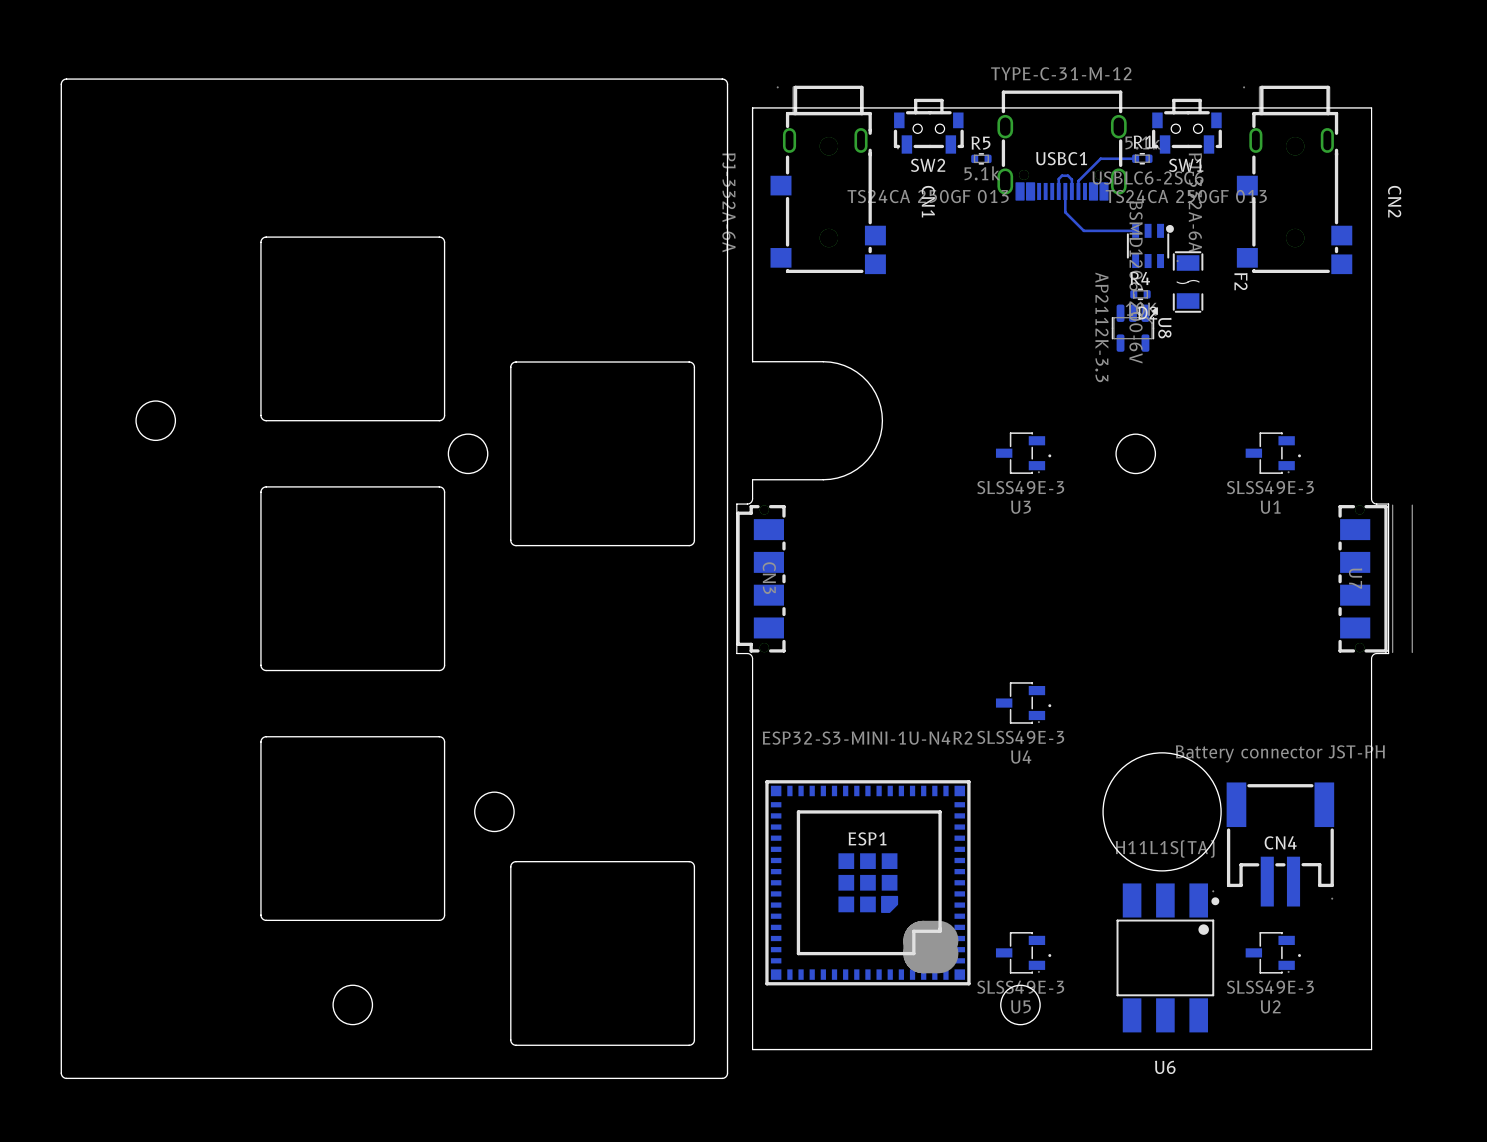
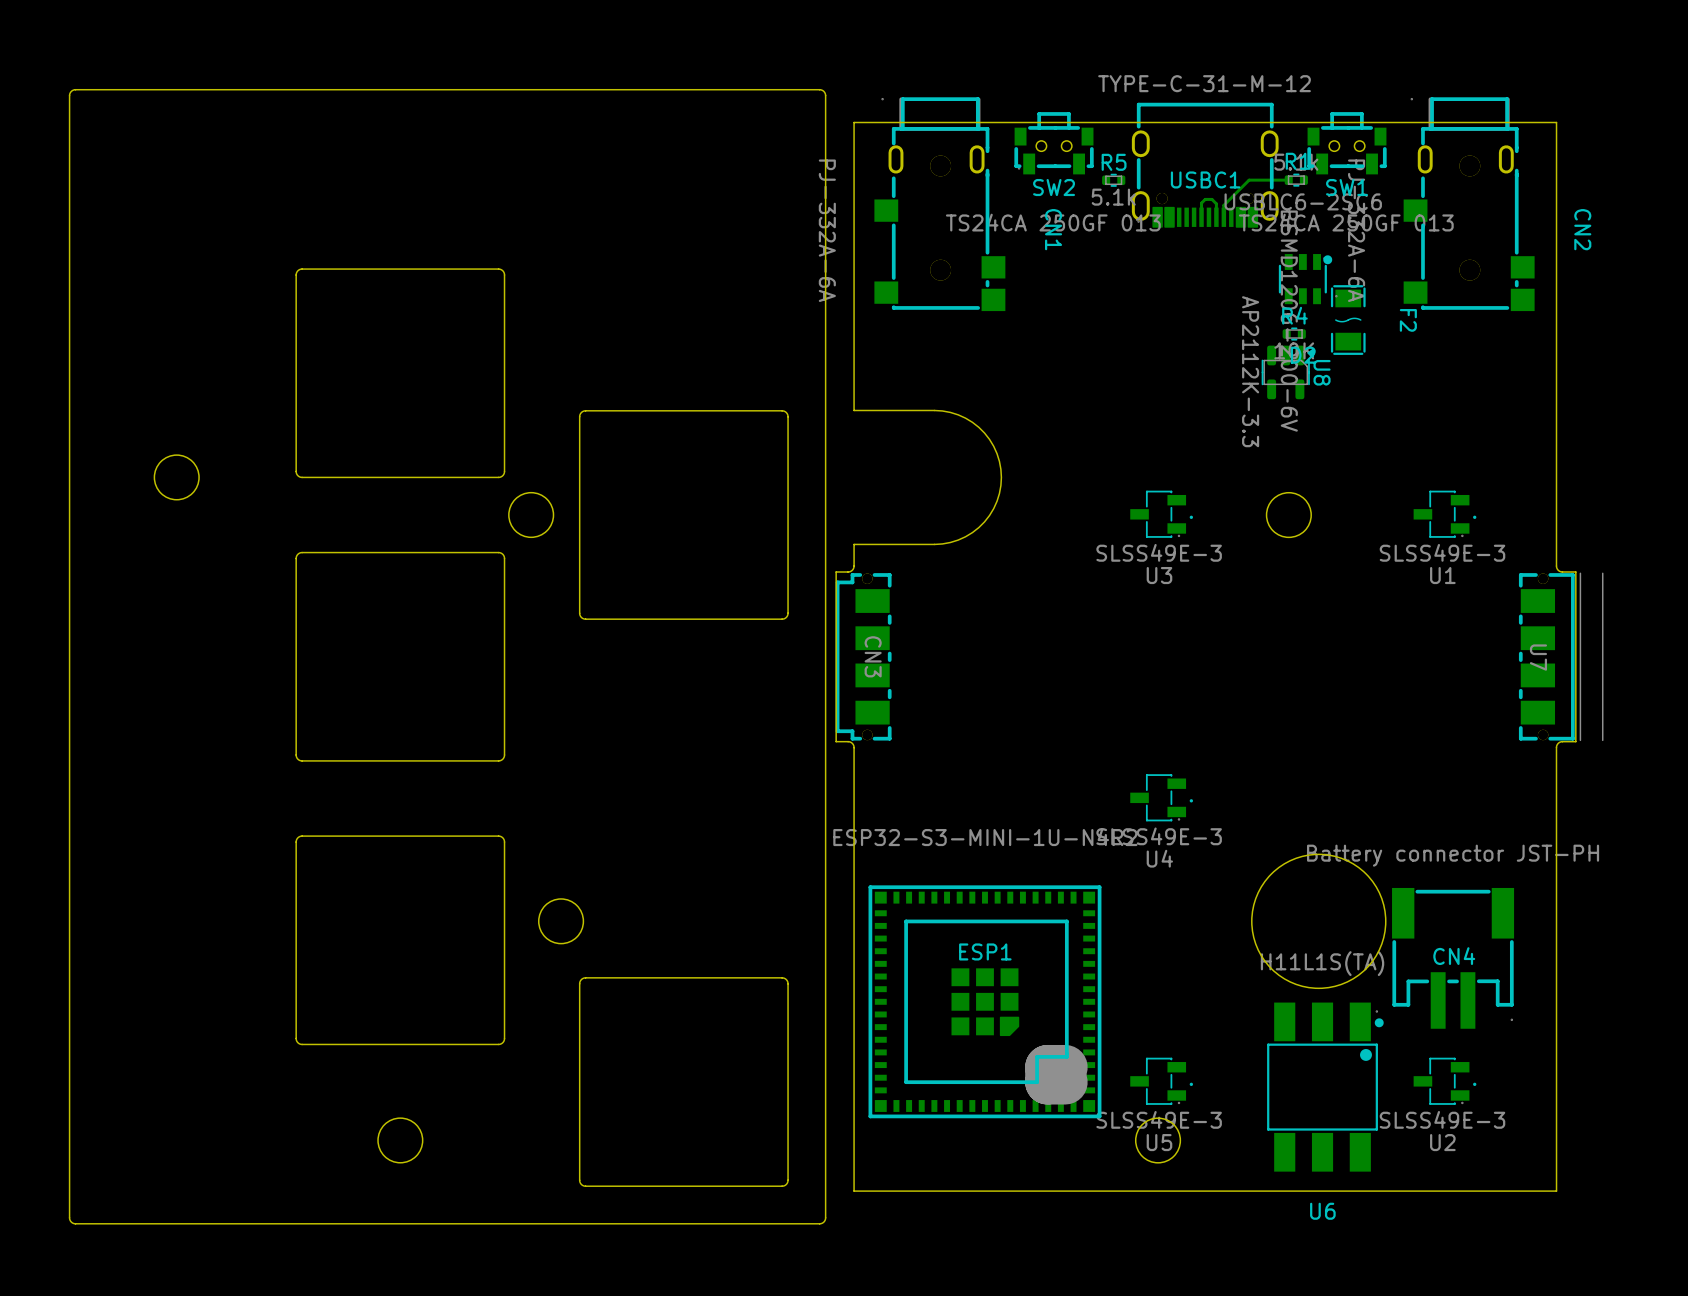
bottom track: (1065, 191) (1065, 212) (1083, 230) (1135, 230) -> none

